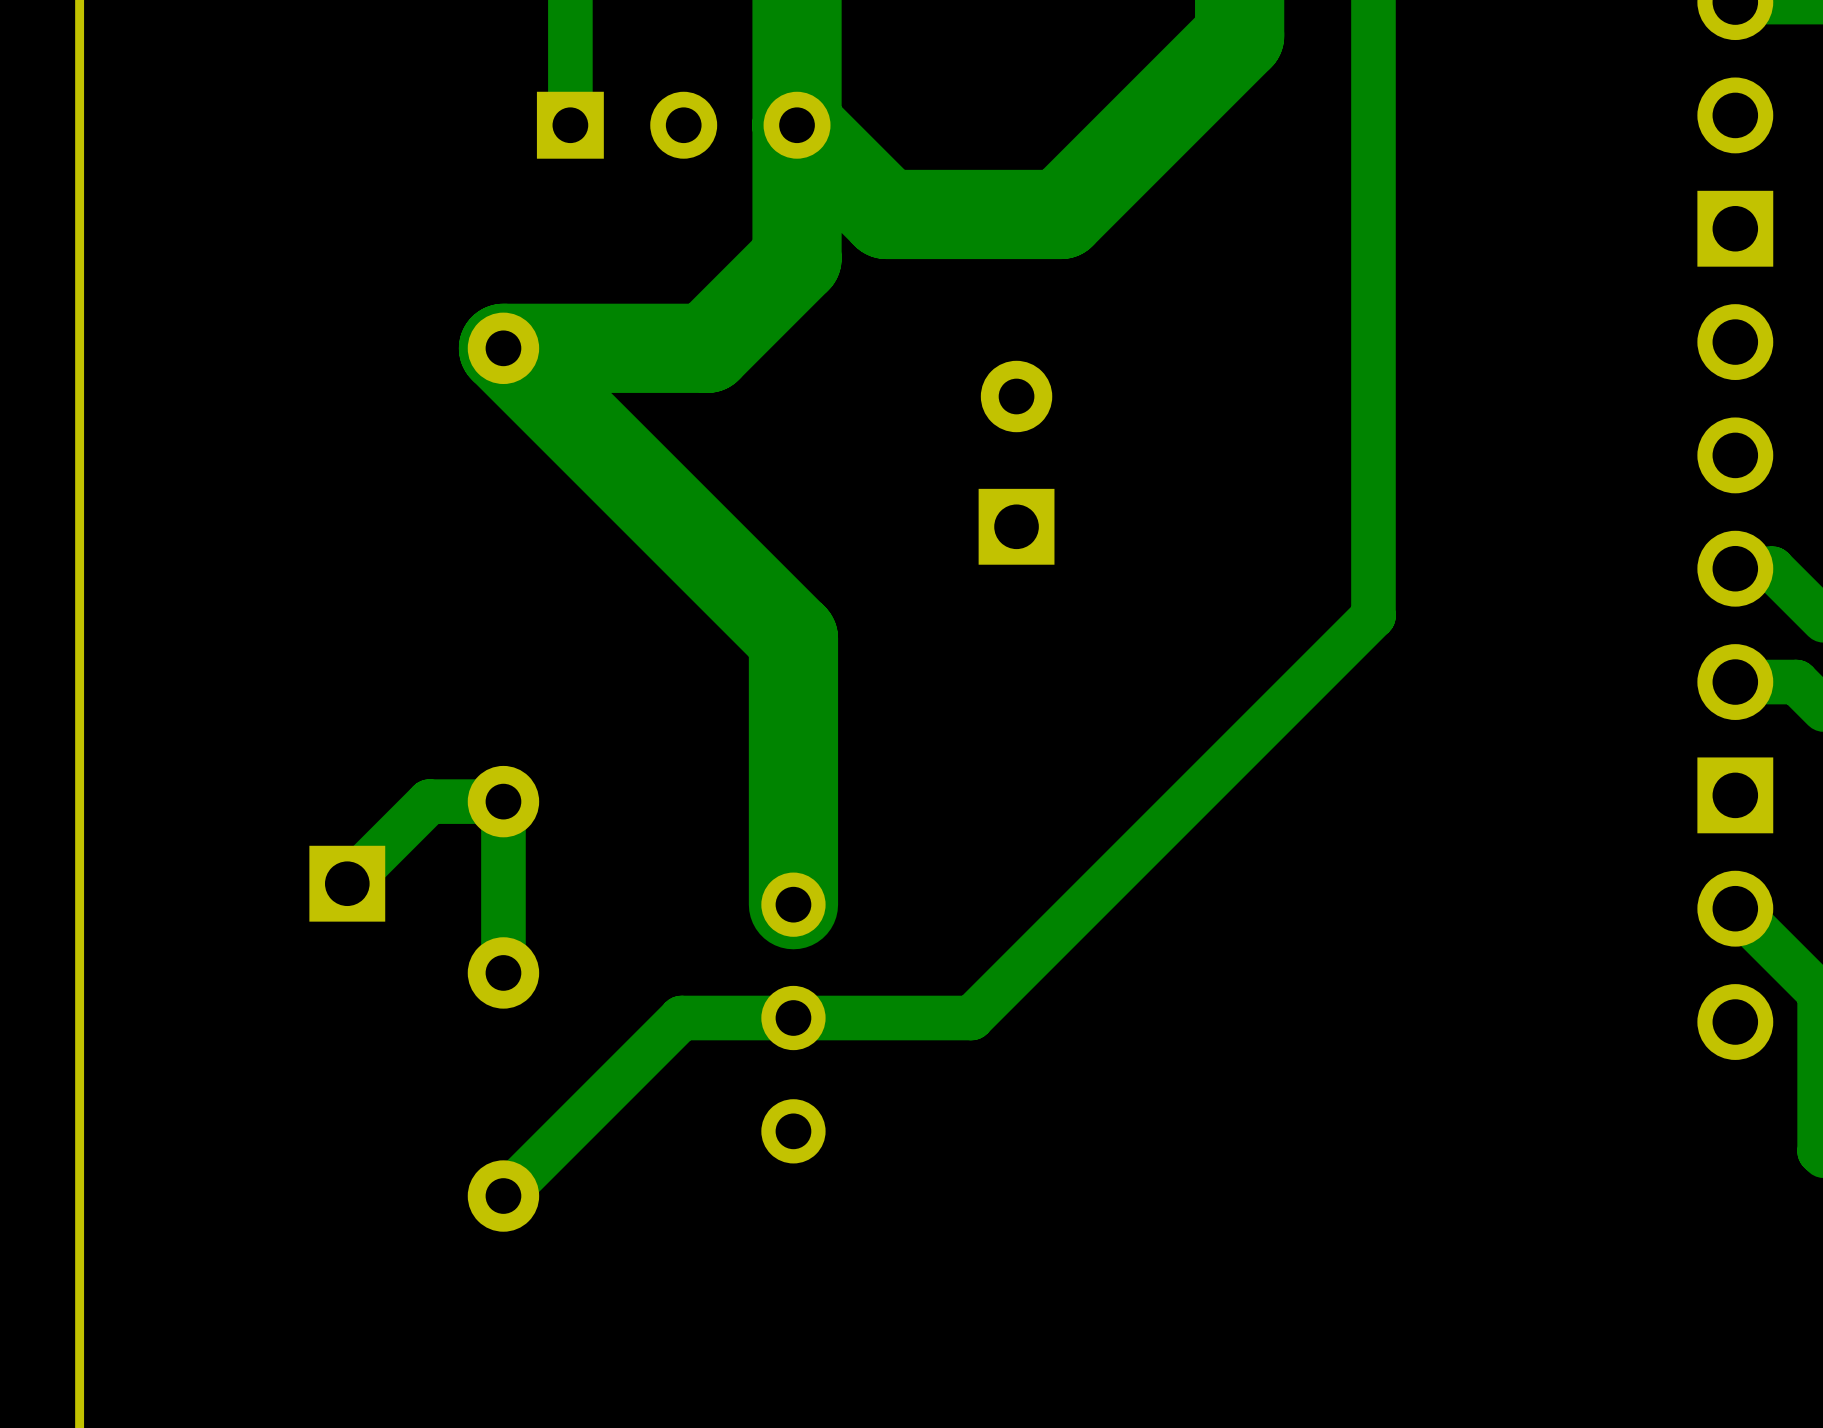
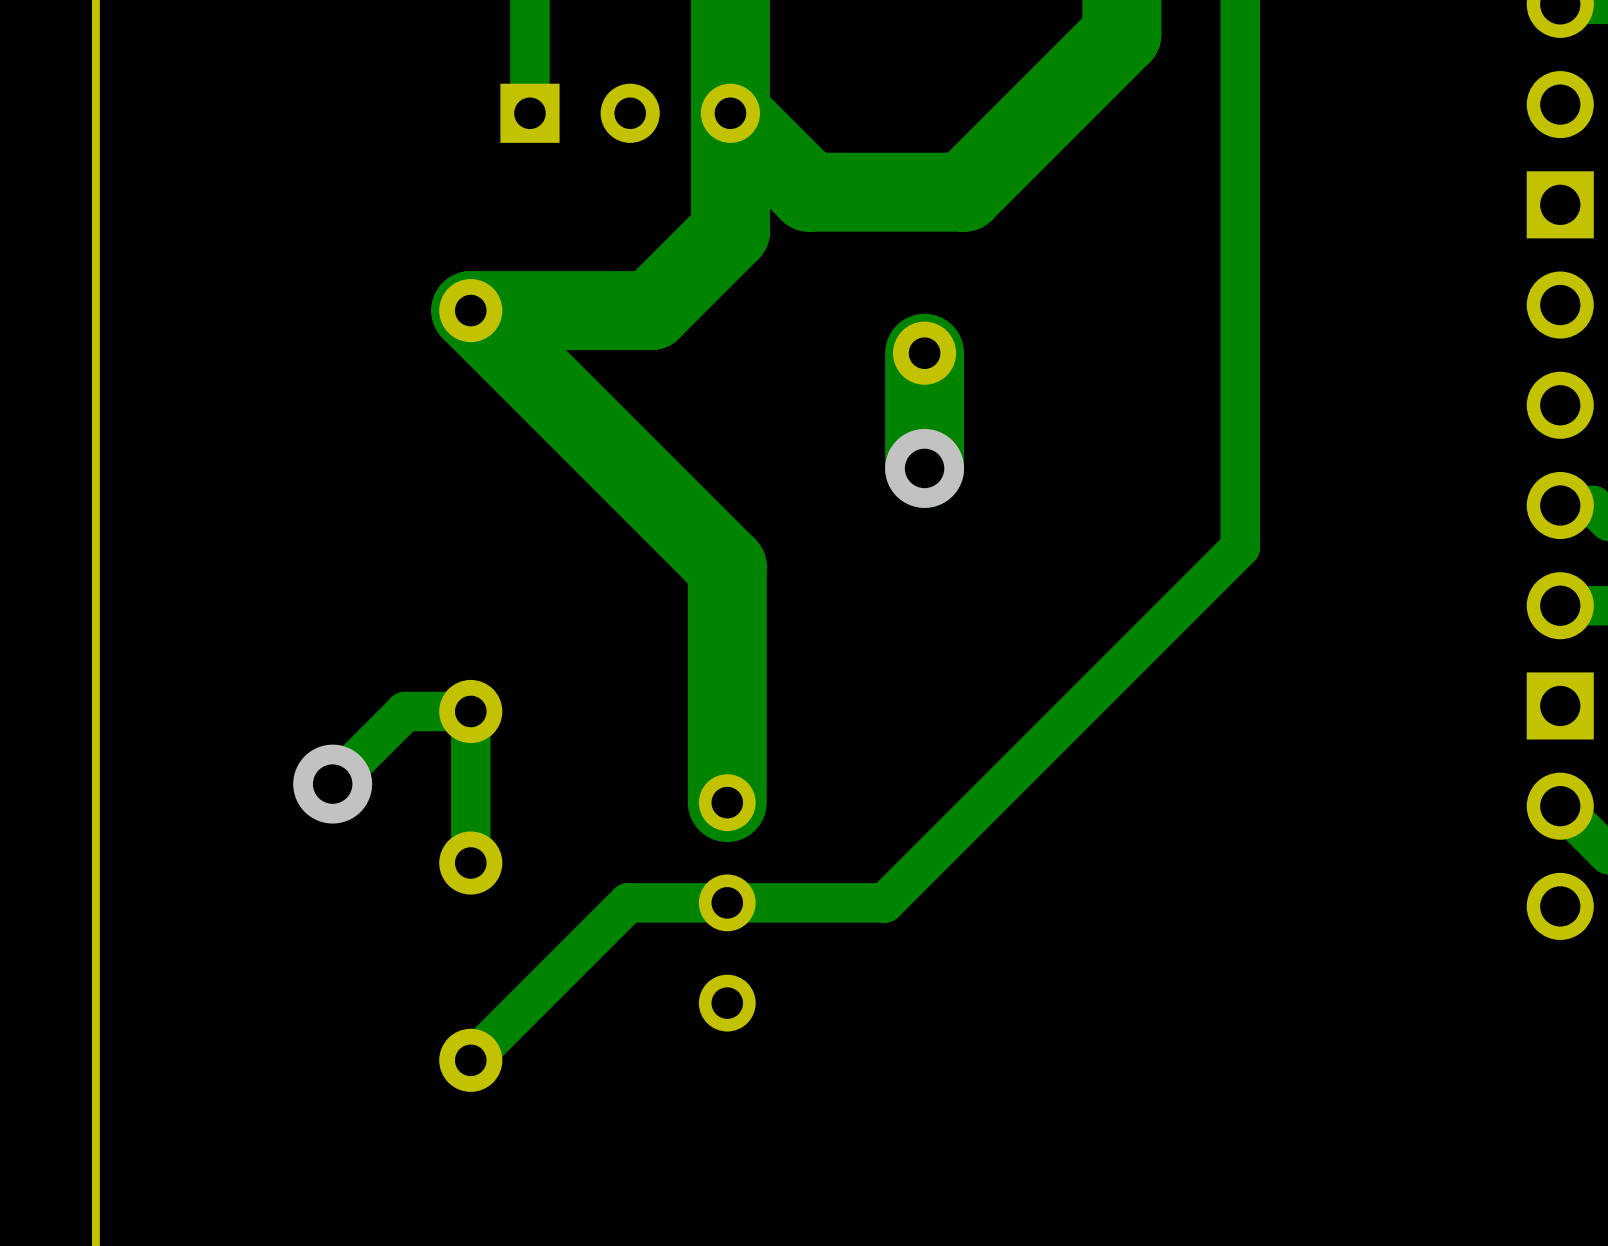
track: none -> (924, 353) (924, 468)
part: (1016, 526) -> none
via: none -> (924, 468)
part: (347, 883) -> none
via: none -> (332, 784)

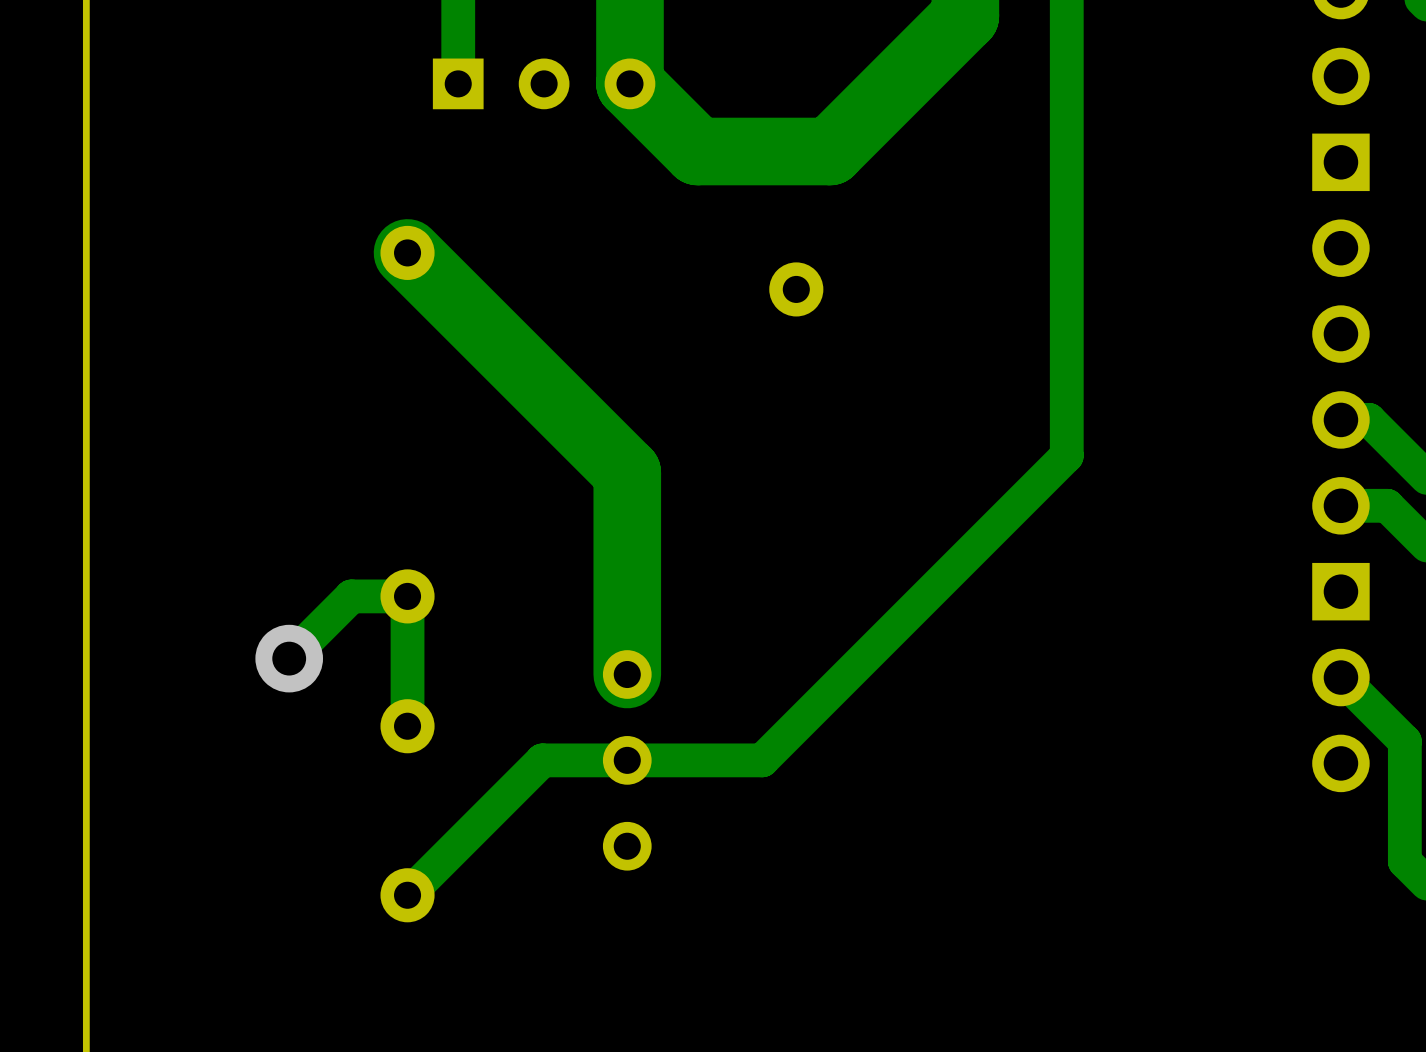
track: (730, 113) (730, 231) (651, 310) (470, 310) -> none
track: (924, 353) (924, 468) -> none
via: (924, 468) -> none

